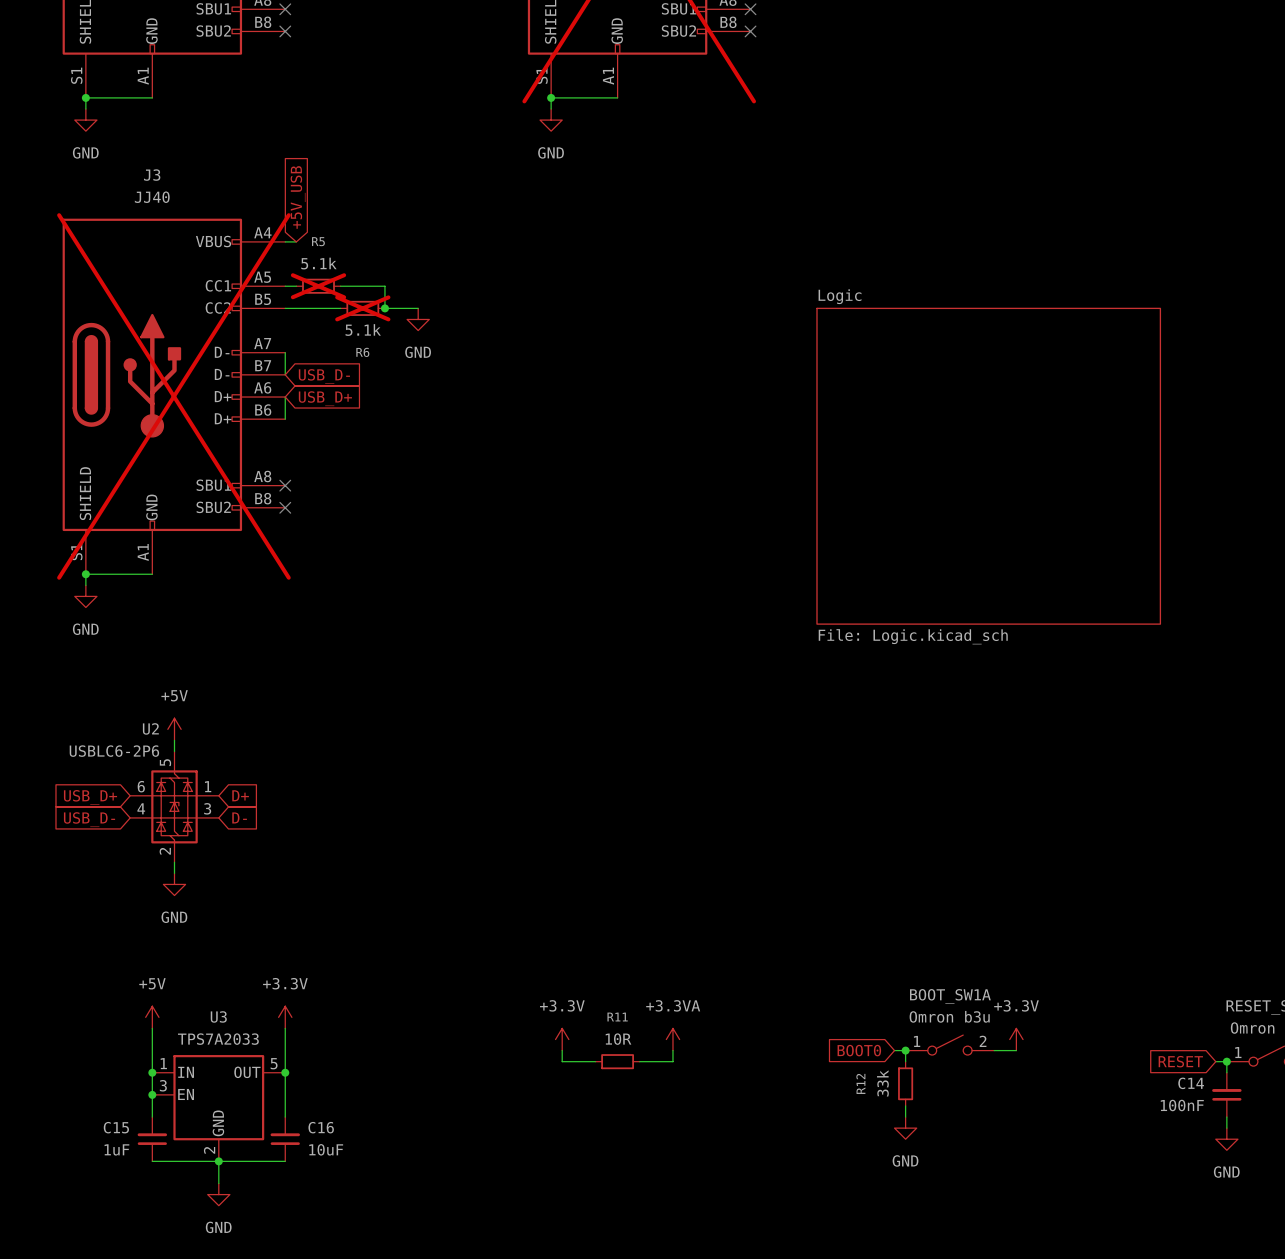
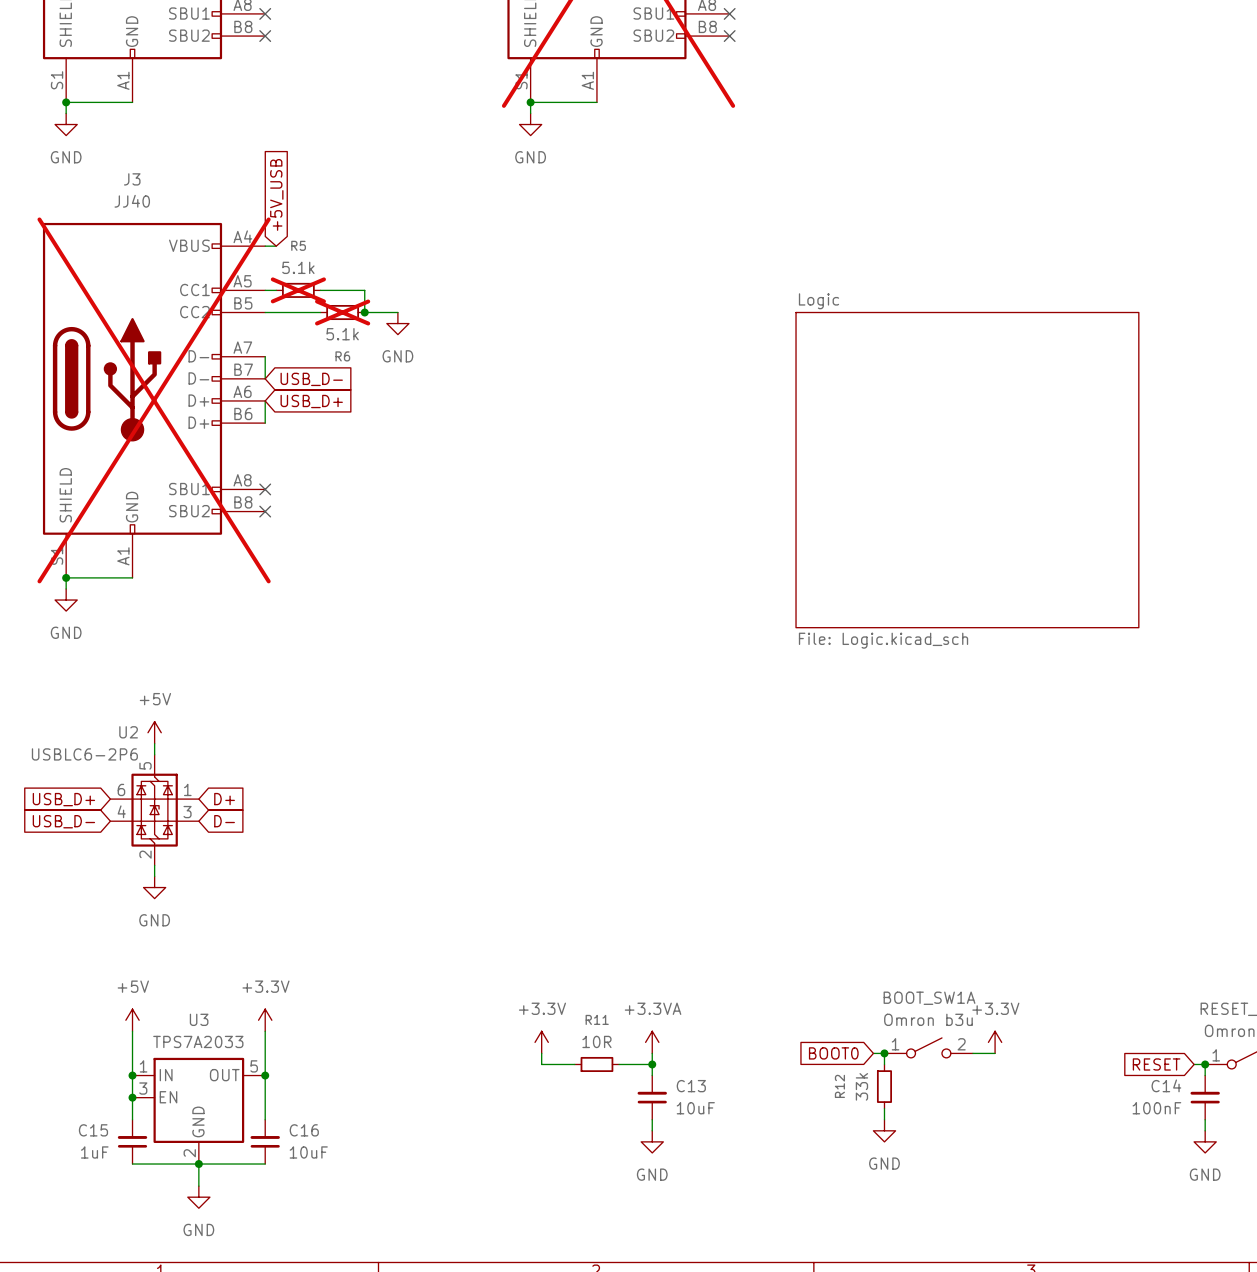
wire: none -> (652, 1064) (652, 1075)
junction: none -> (652, 1064)
C13: none -> 10uF (652, 1097)
wire: none -> (652, 1119) (652, 1130)
power symbol: none -> GND (652, 1141)

